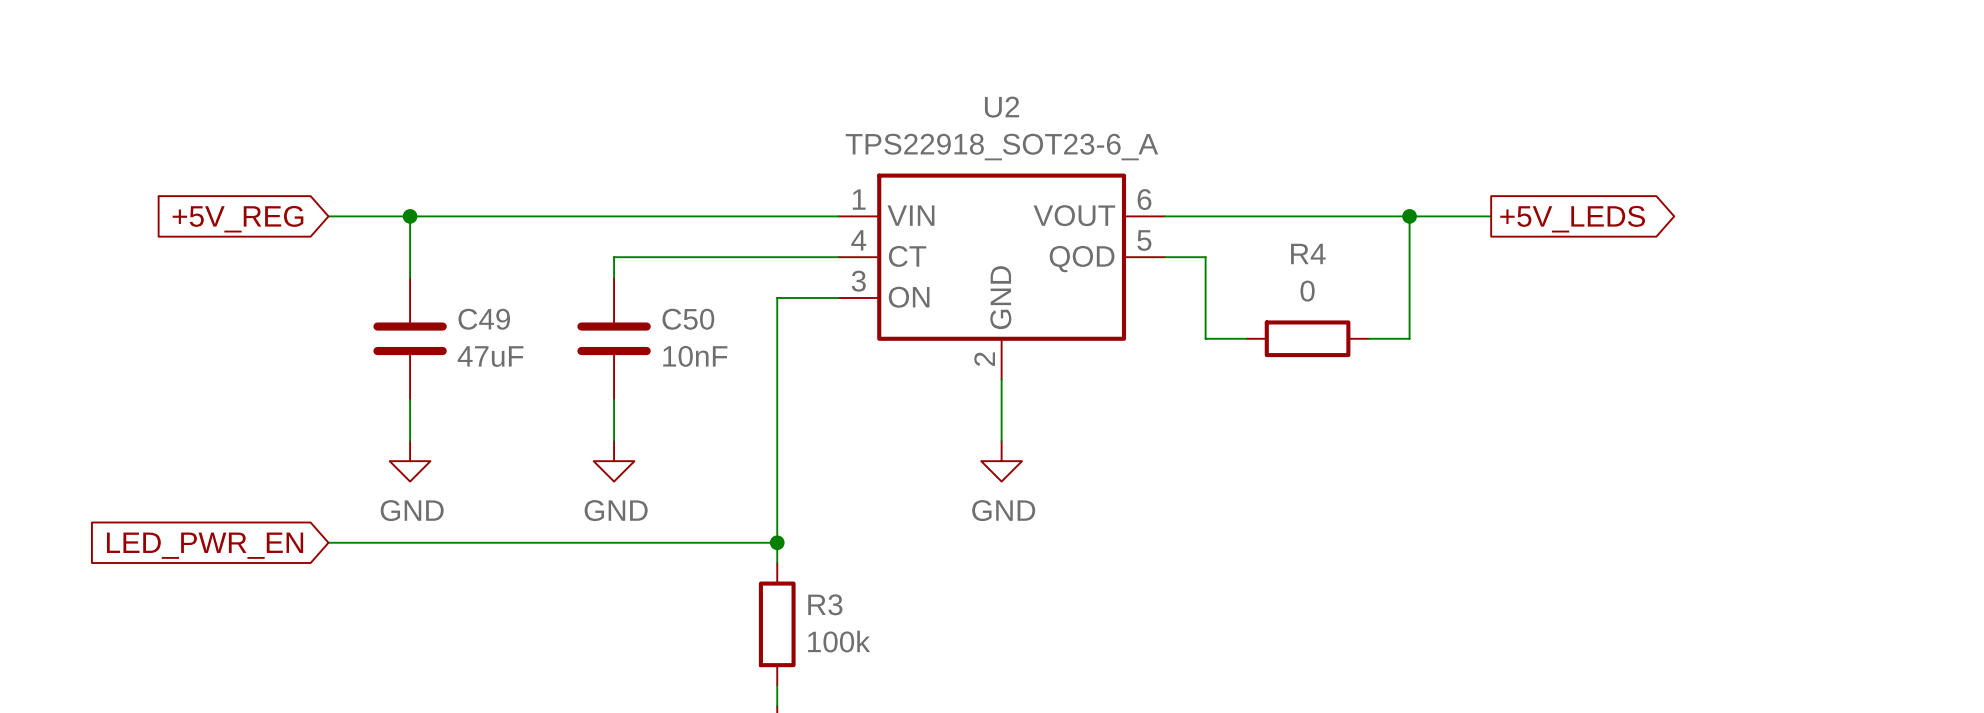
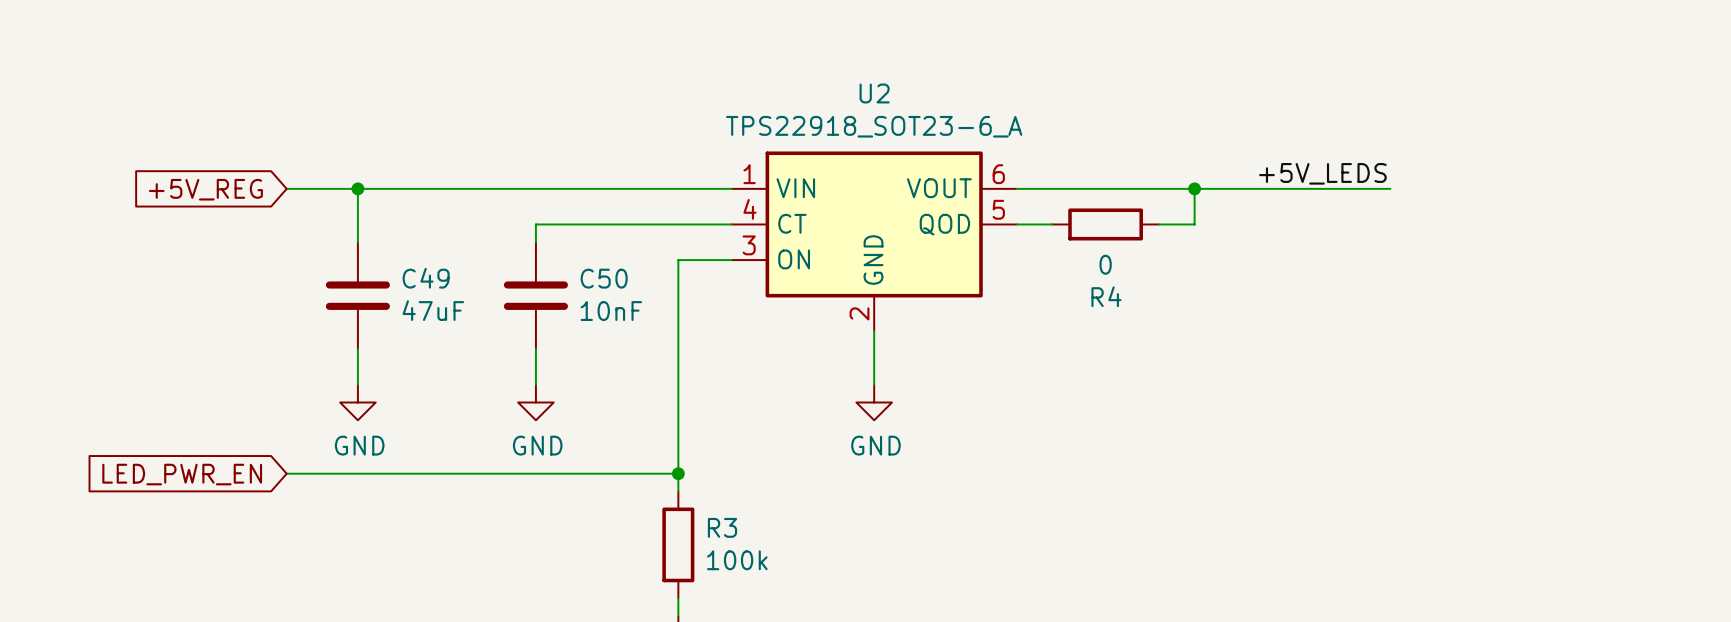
label: none -> +5V_LEDS (1322, 173)
wire: none -> (1194, 188) (1194, 224) (1159, 224)
wire: (1409, 216) (1409, 338) (1368, 338) -> none
junction position: (1409, 216) -> (1194, 188)
wire: none -> (1301, 188) (1390, 188)
global label: +5V_LEDS (1572, 219) -> none
R4 name position: R4 (1308, 253) -> R4 (1106, 296)
wire: (1205, 257) (1205, 338) (1246, 338) -> none
R4 value position: 0 (1307, 291) -> 0 (1105, 264)
R4 position: (1307, 338) -> (1105, 224)

